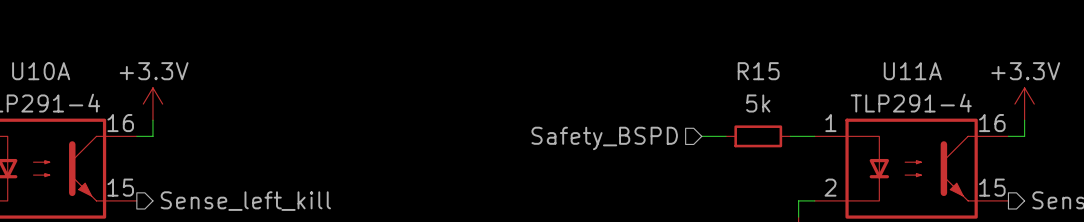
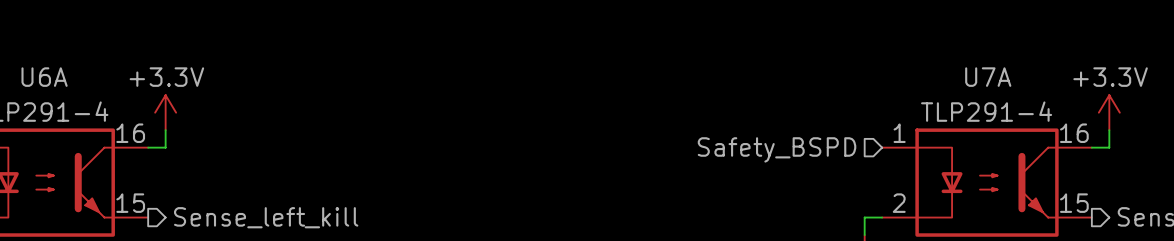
U10A name: U10A (41, 71) -> U6A (44, 77)
U11A name: U11A (912, 71) -> U7A (988, 77)
wire: (701, 136) (725, 136) -> none
R15: 5k (758, 136) -> none
wire: (790, 136) (814, 136) -> none
hierarchical label position: Safety_BSPD (604, 138) -> Safety_BSPD (777, 149)

